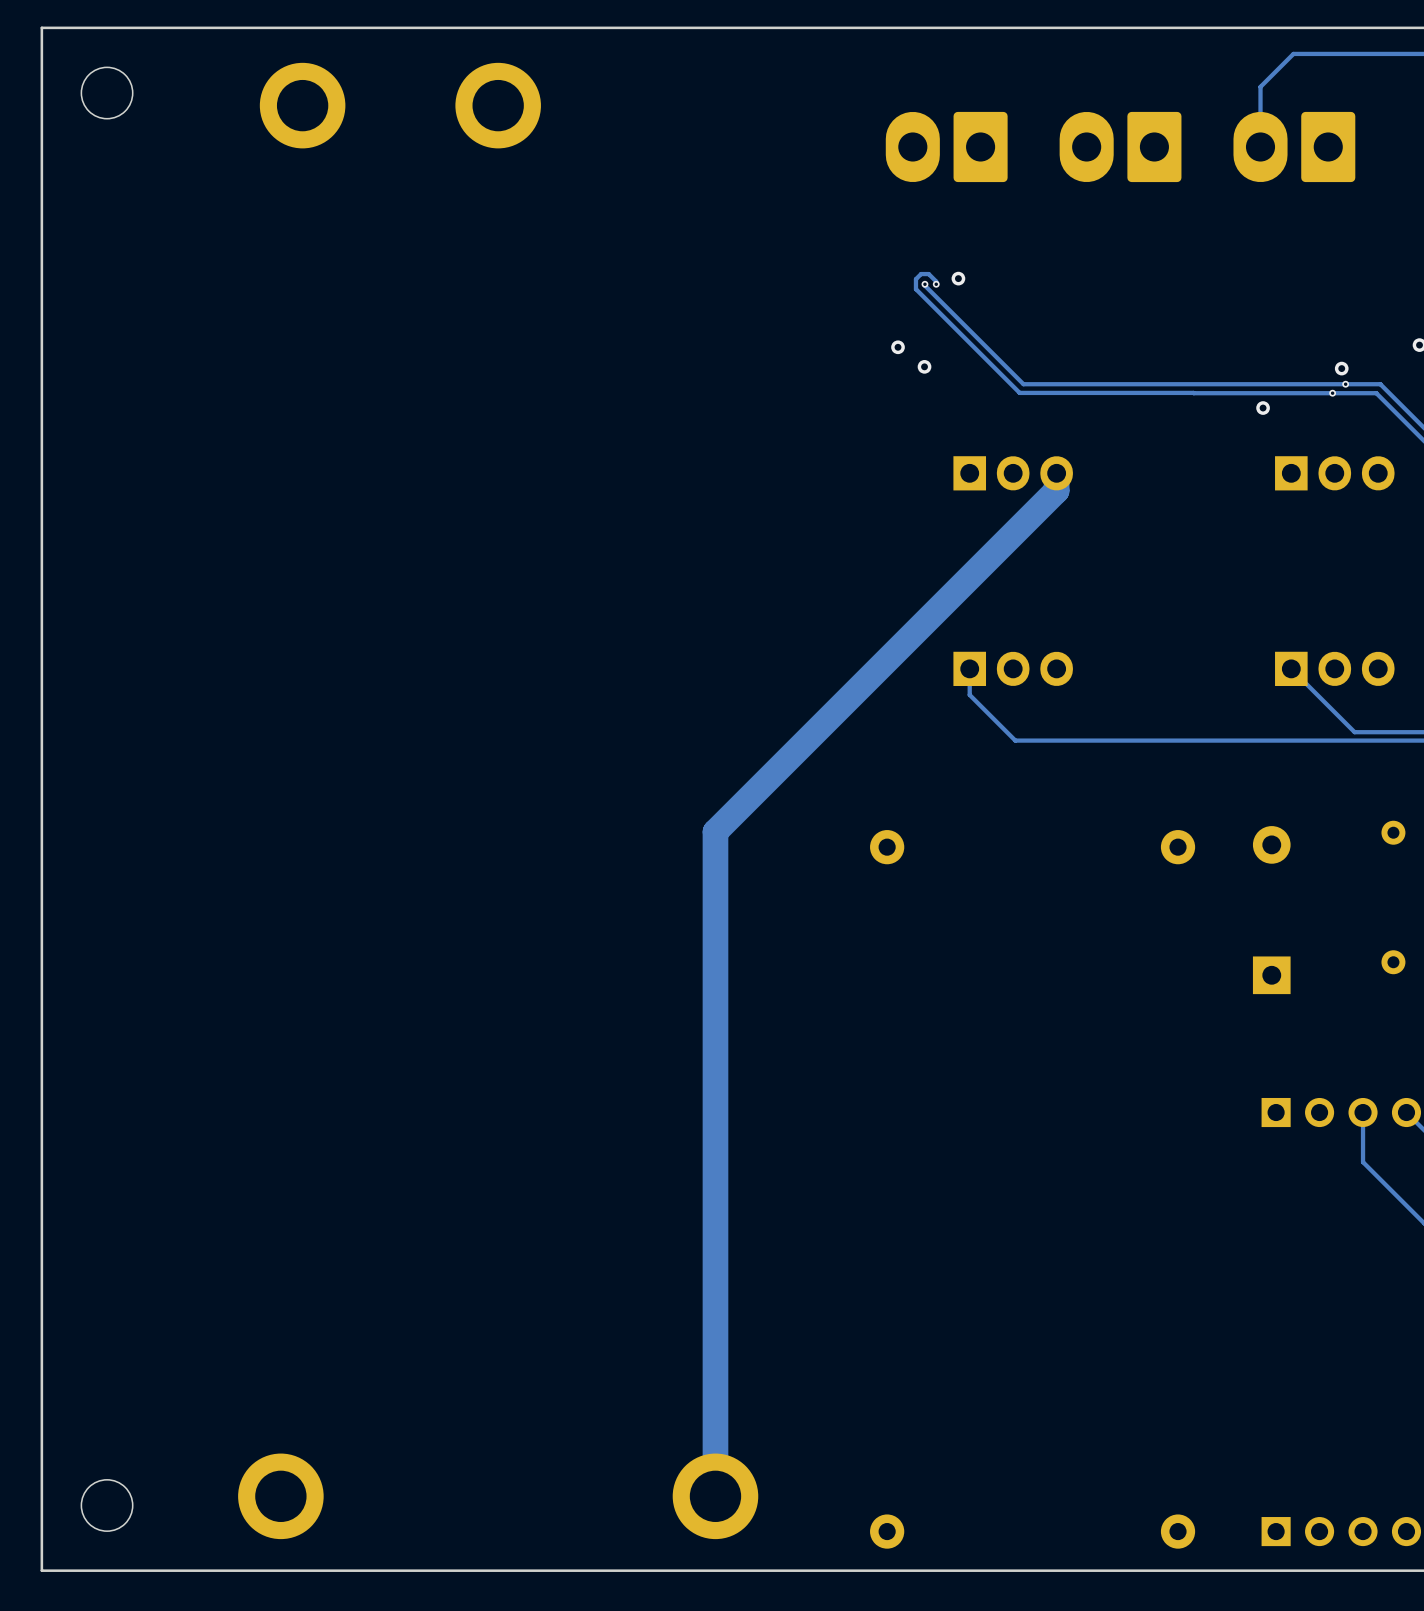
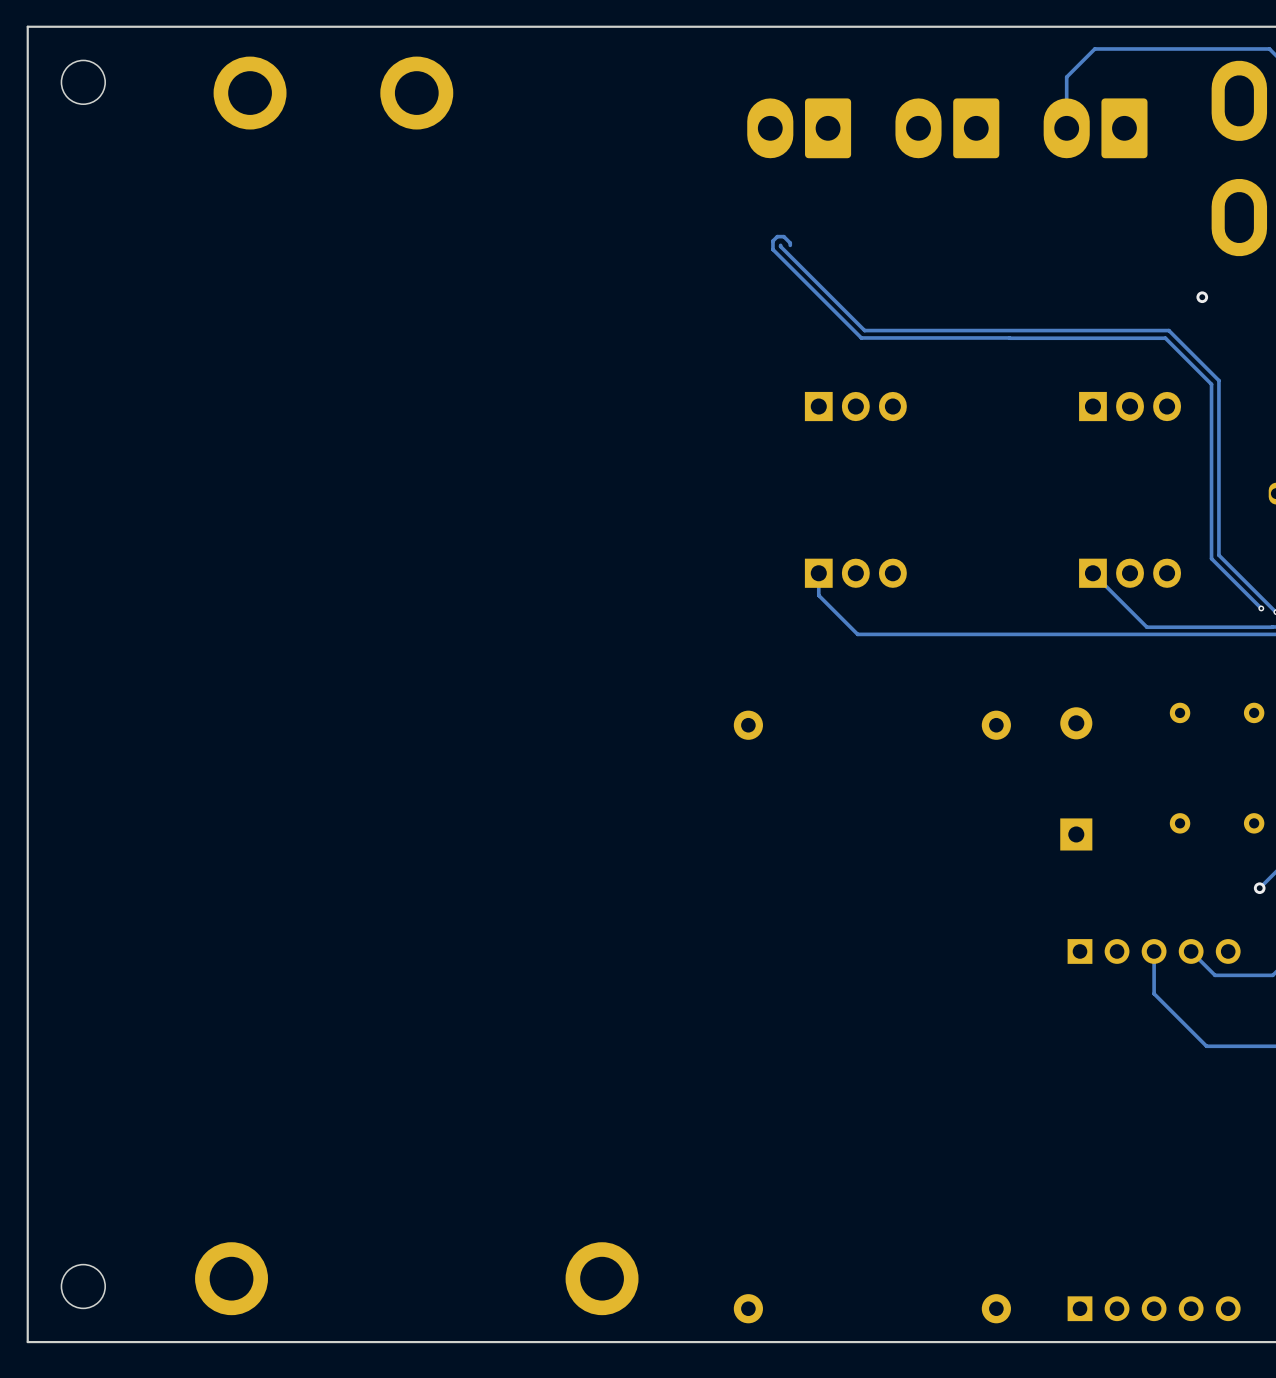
via: (958, 278) -> none
via: (924, 284) -> none
via: (936, 284) -> none
via: (898, 347) -> none
via: (924, 366) -> none
via: (1341, 368) -> none
via: (1345, 384) -> none
via: (1332, 393) -> none
via: (1263, 408) -> none
track: (1056, 473) (1056, 490) (715, 831) (715, 1496) -> none

